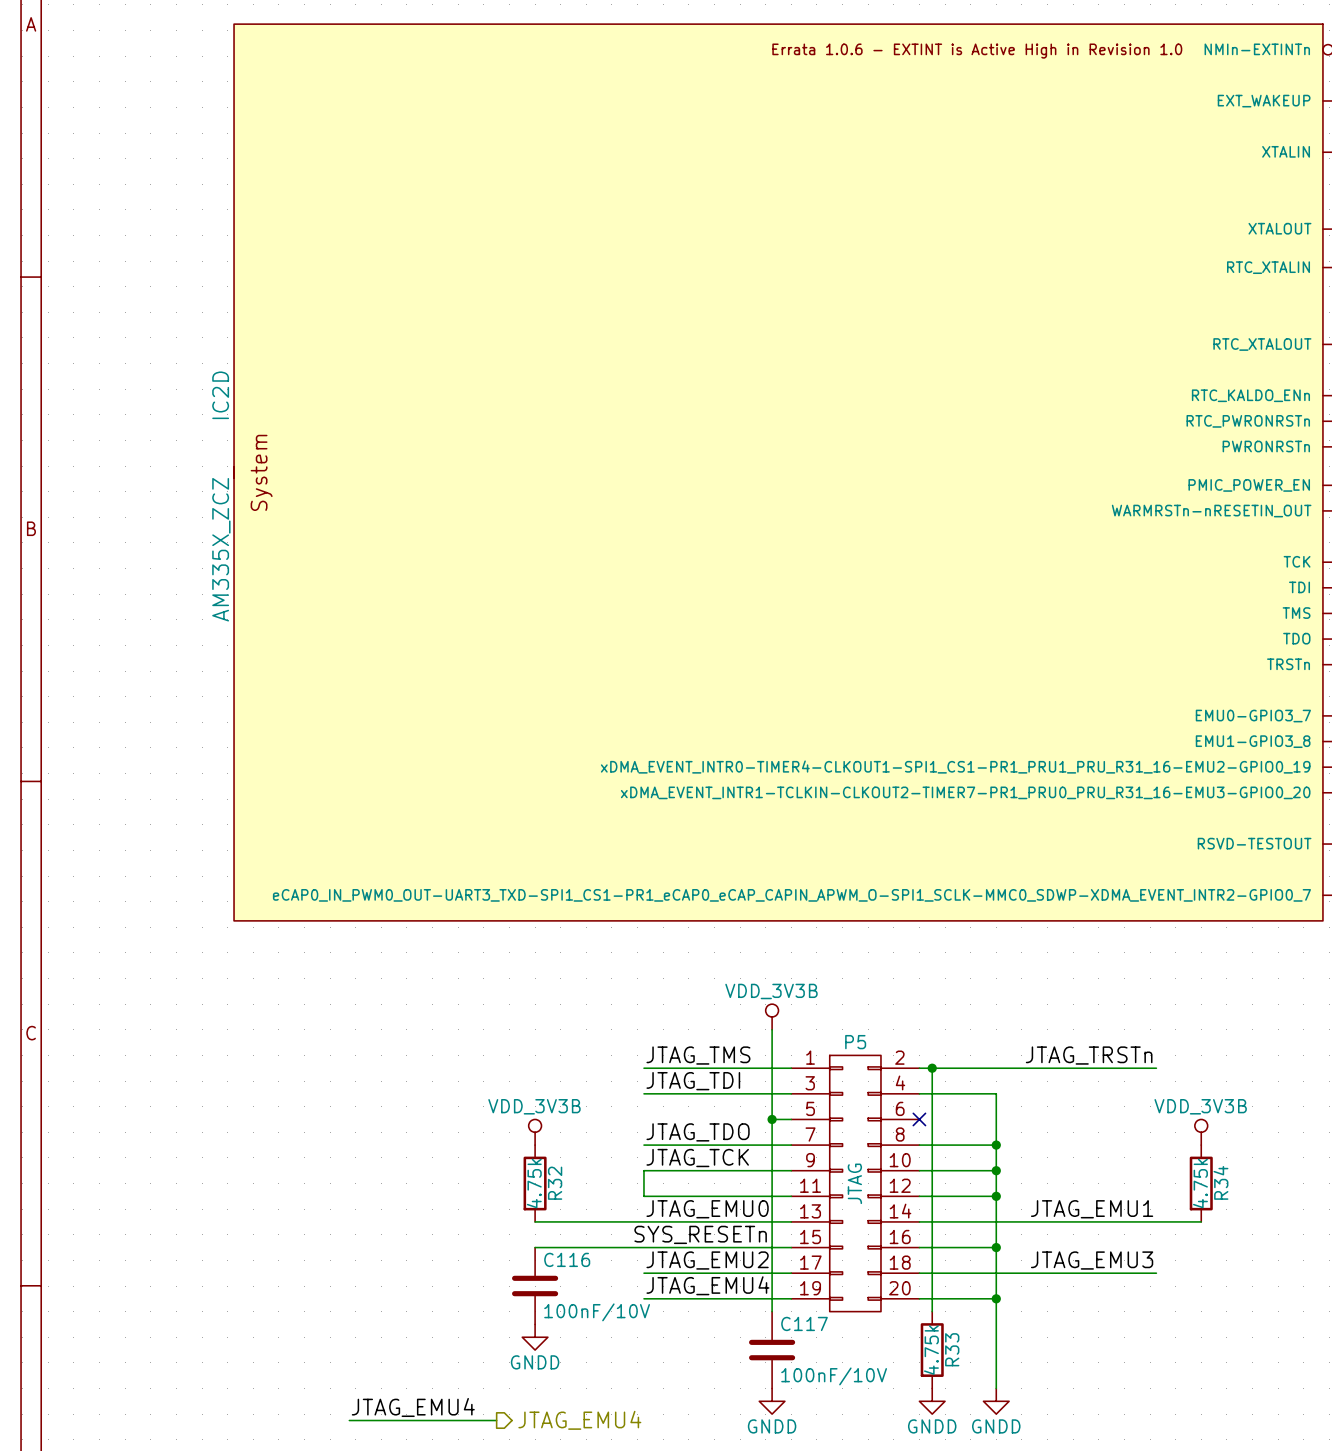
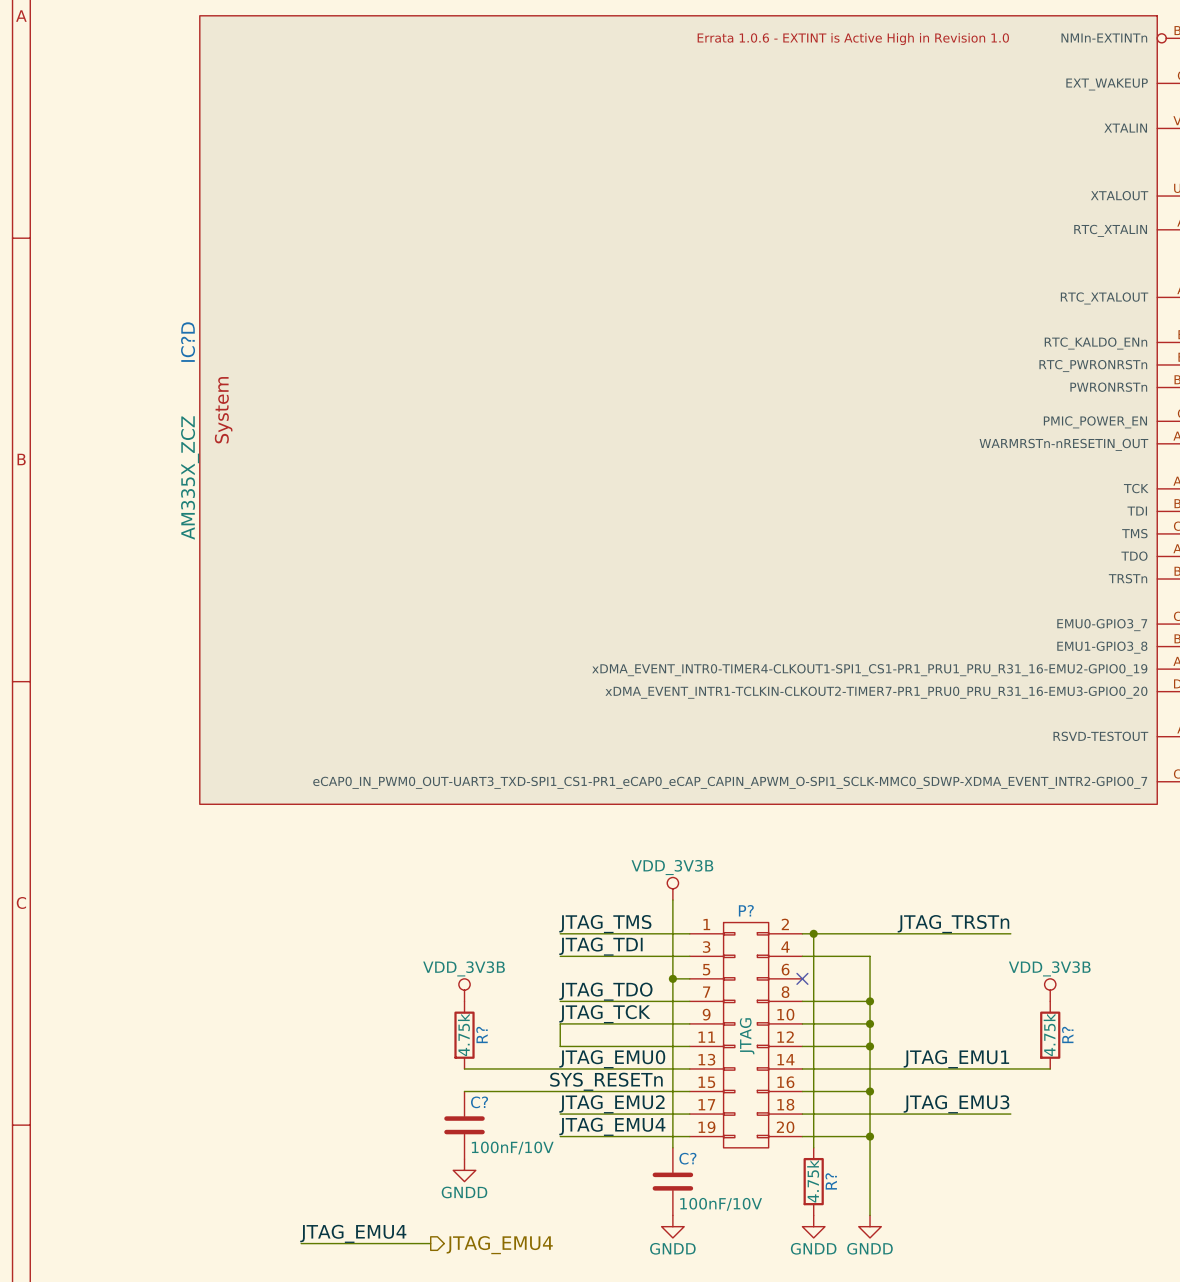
IC2D name: IC2D (220, 395) -> IC?D (188, 342)
P5 name: P5 (855, 1042) -> P? (746, 910)
R34 name: R34 (1220, 1182) -> R? (1067, 1034)
R32 name: R32 (555, 1183) -> R? (482, 1034)
C116 name: C116 (567, 1259) -> C? (479, 1102)
C117 name: C117 (804, 1323) -> C? (687, 1158)
R33 name: R33 (952, 1349) -> R? (831, 1181)

